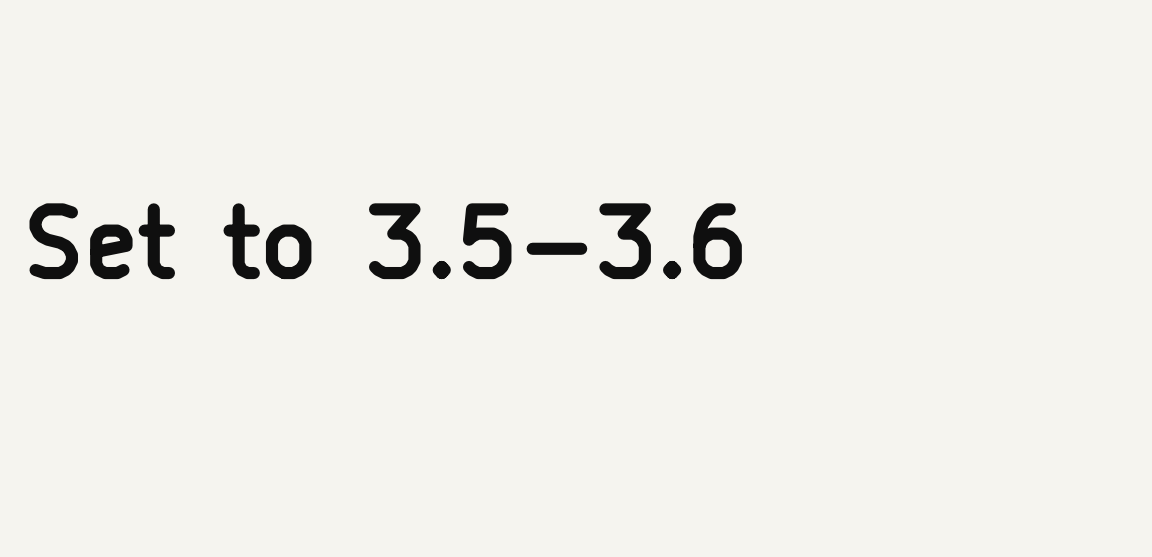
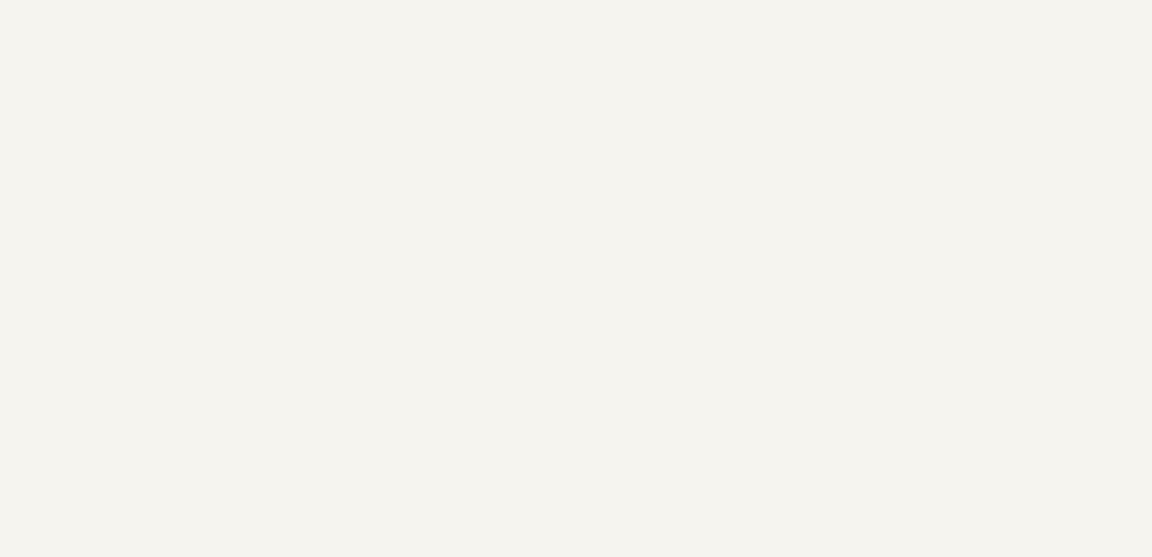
label: Set to 3.5-3.6 (385, 241) -> none

